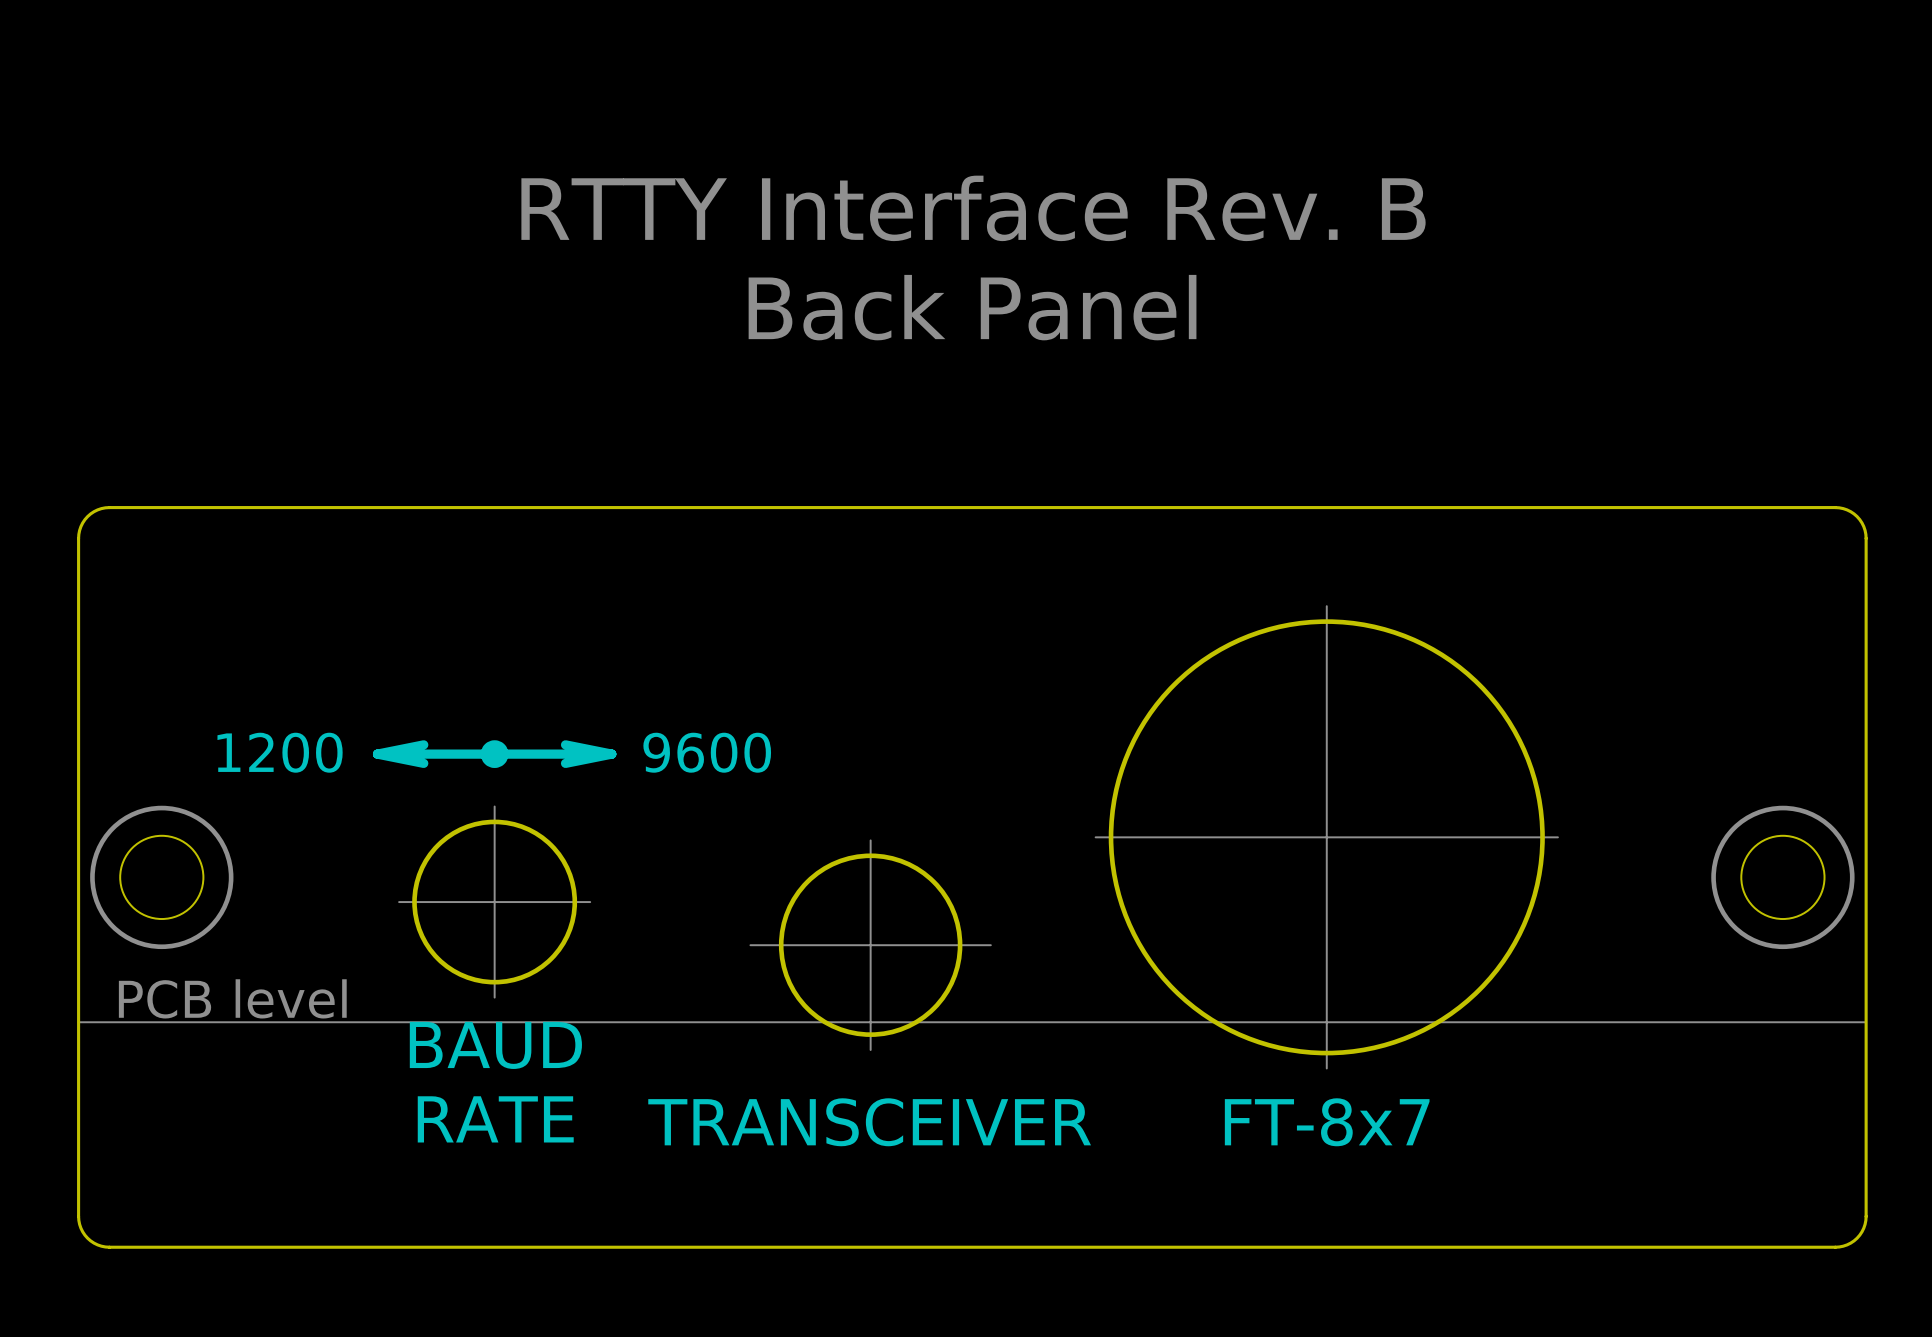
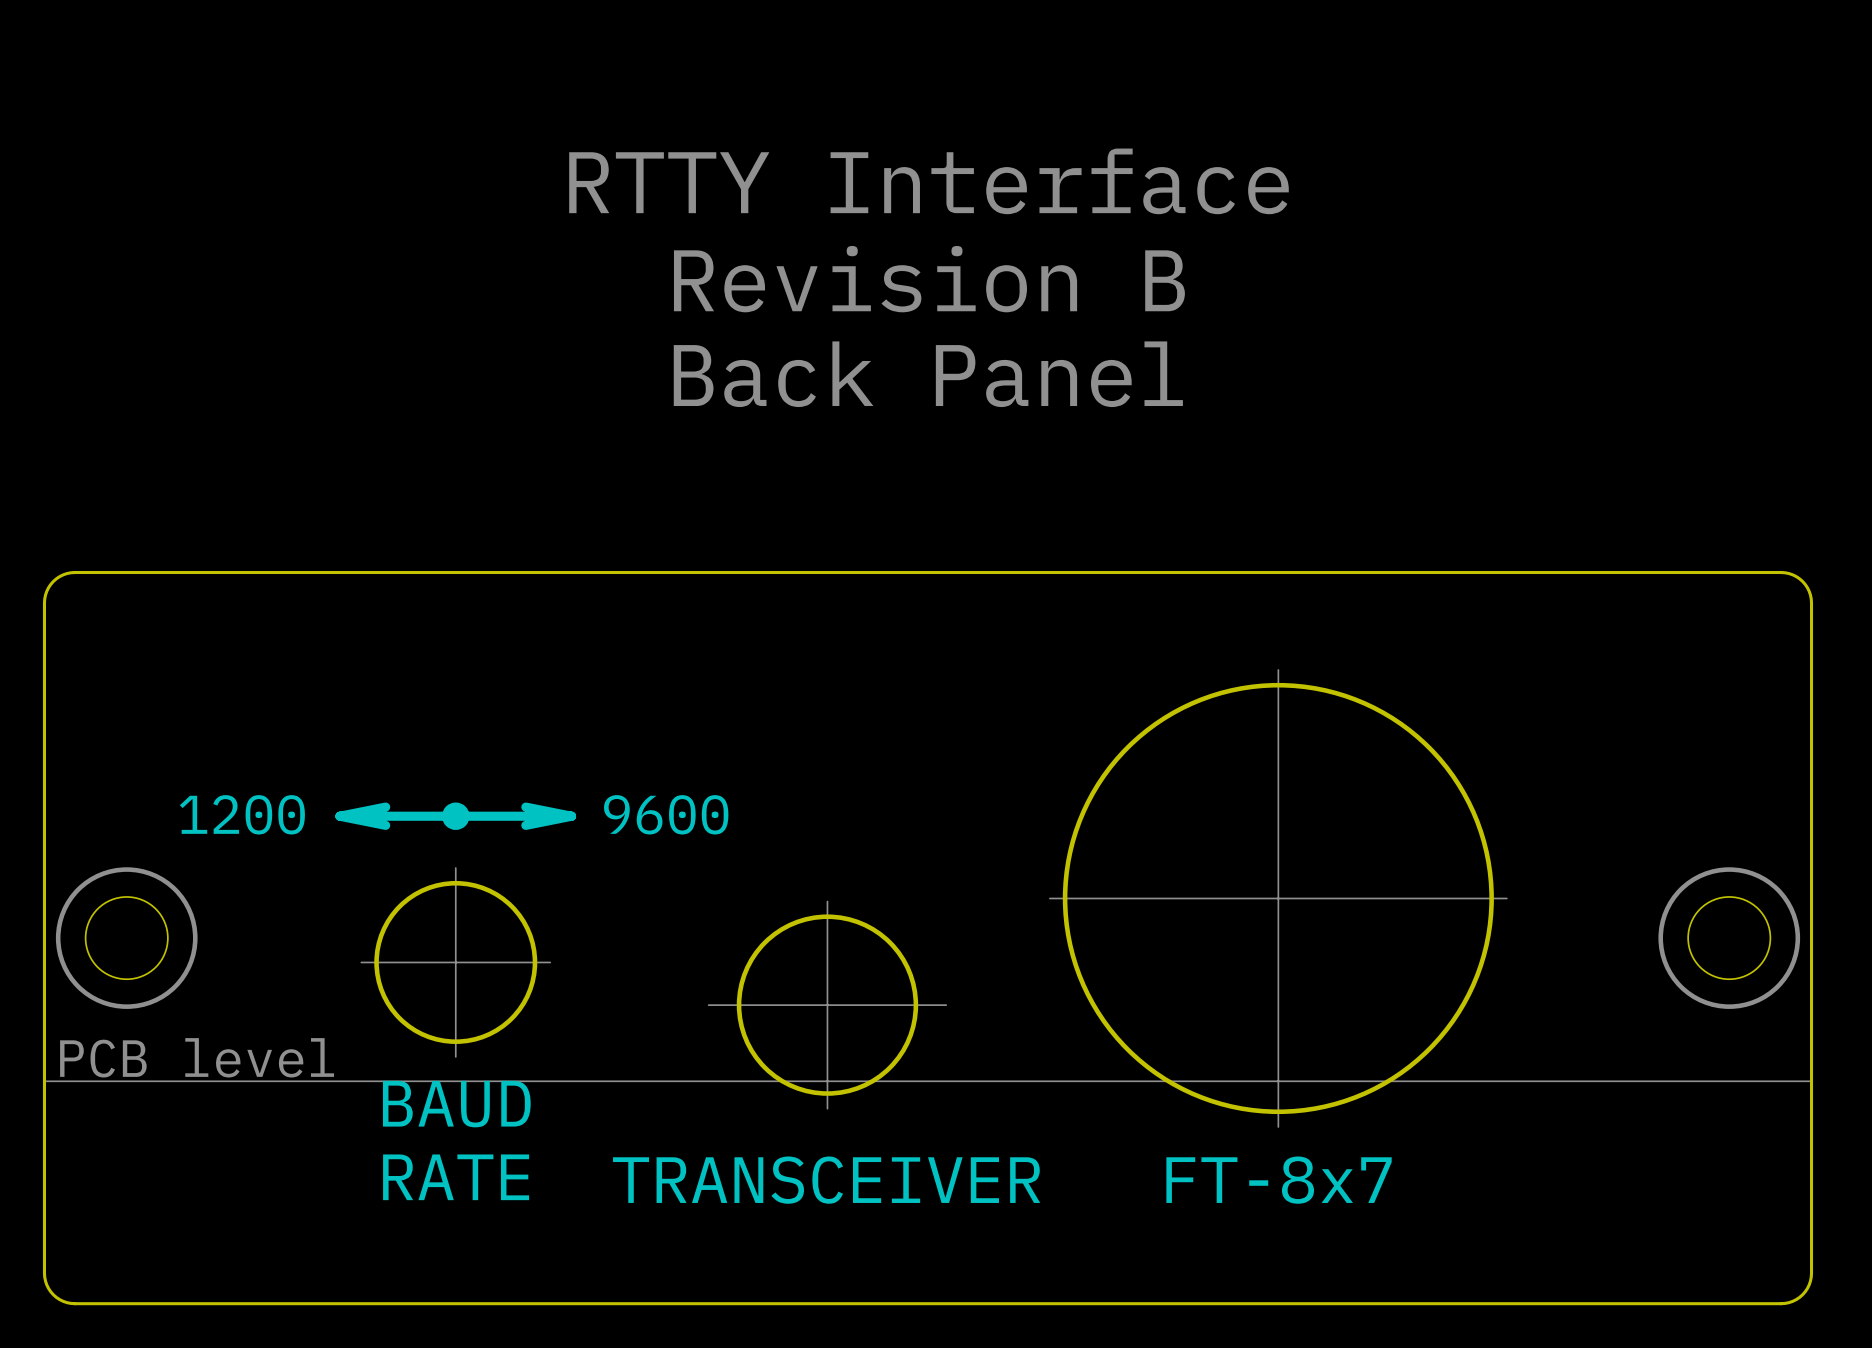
text: none -> RTTY Interface (929, 181)
text: RTTY Interface Rev. B (973, 208) -> Revision B (929, 279)

